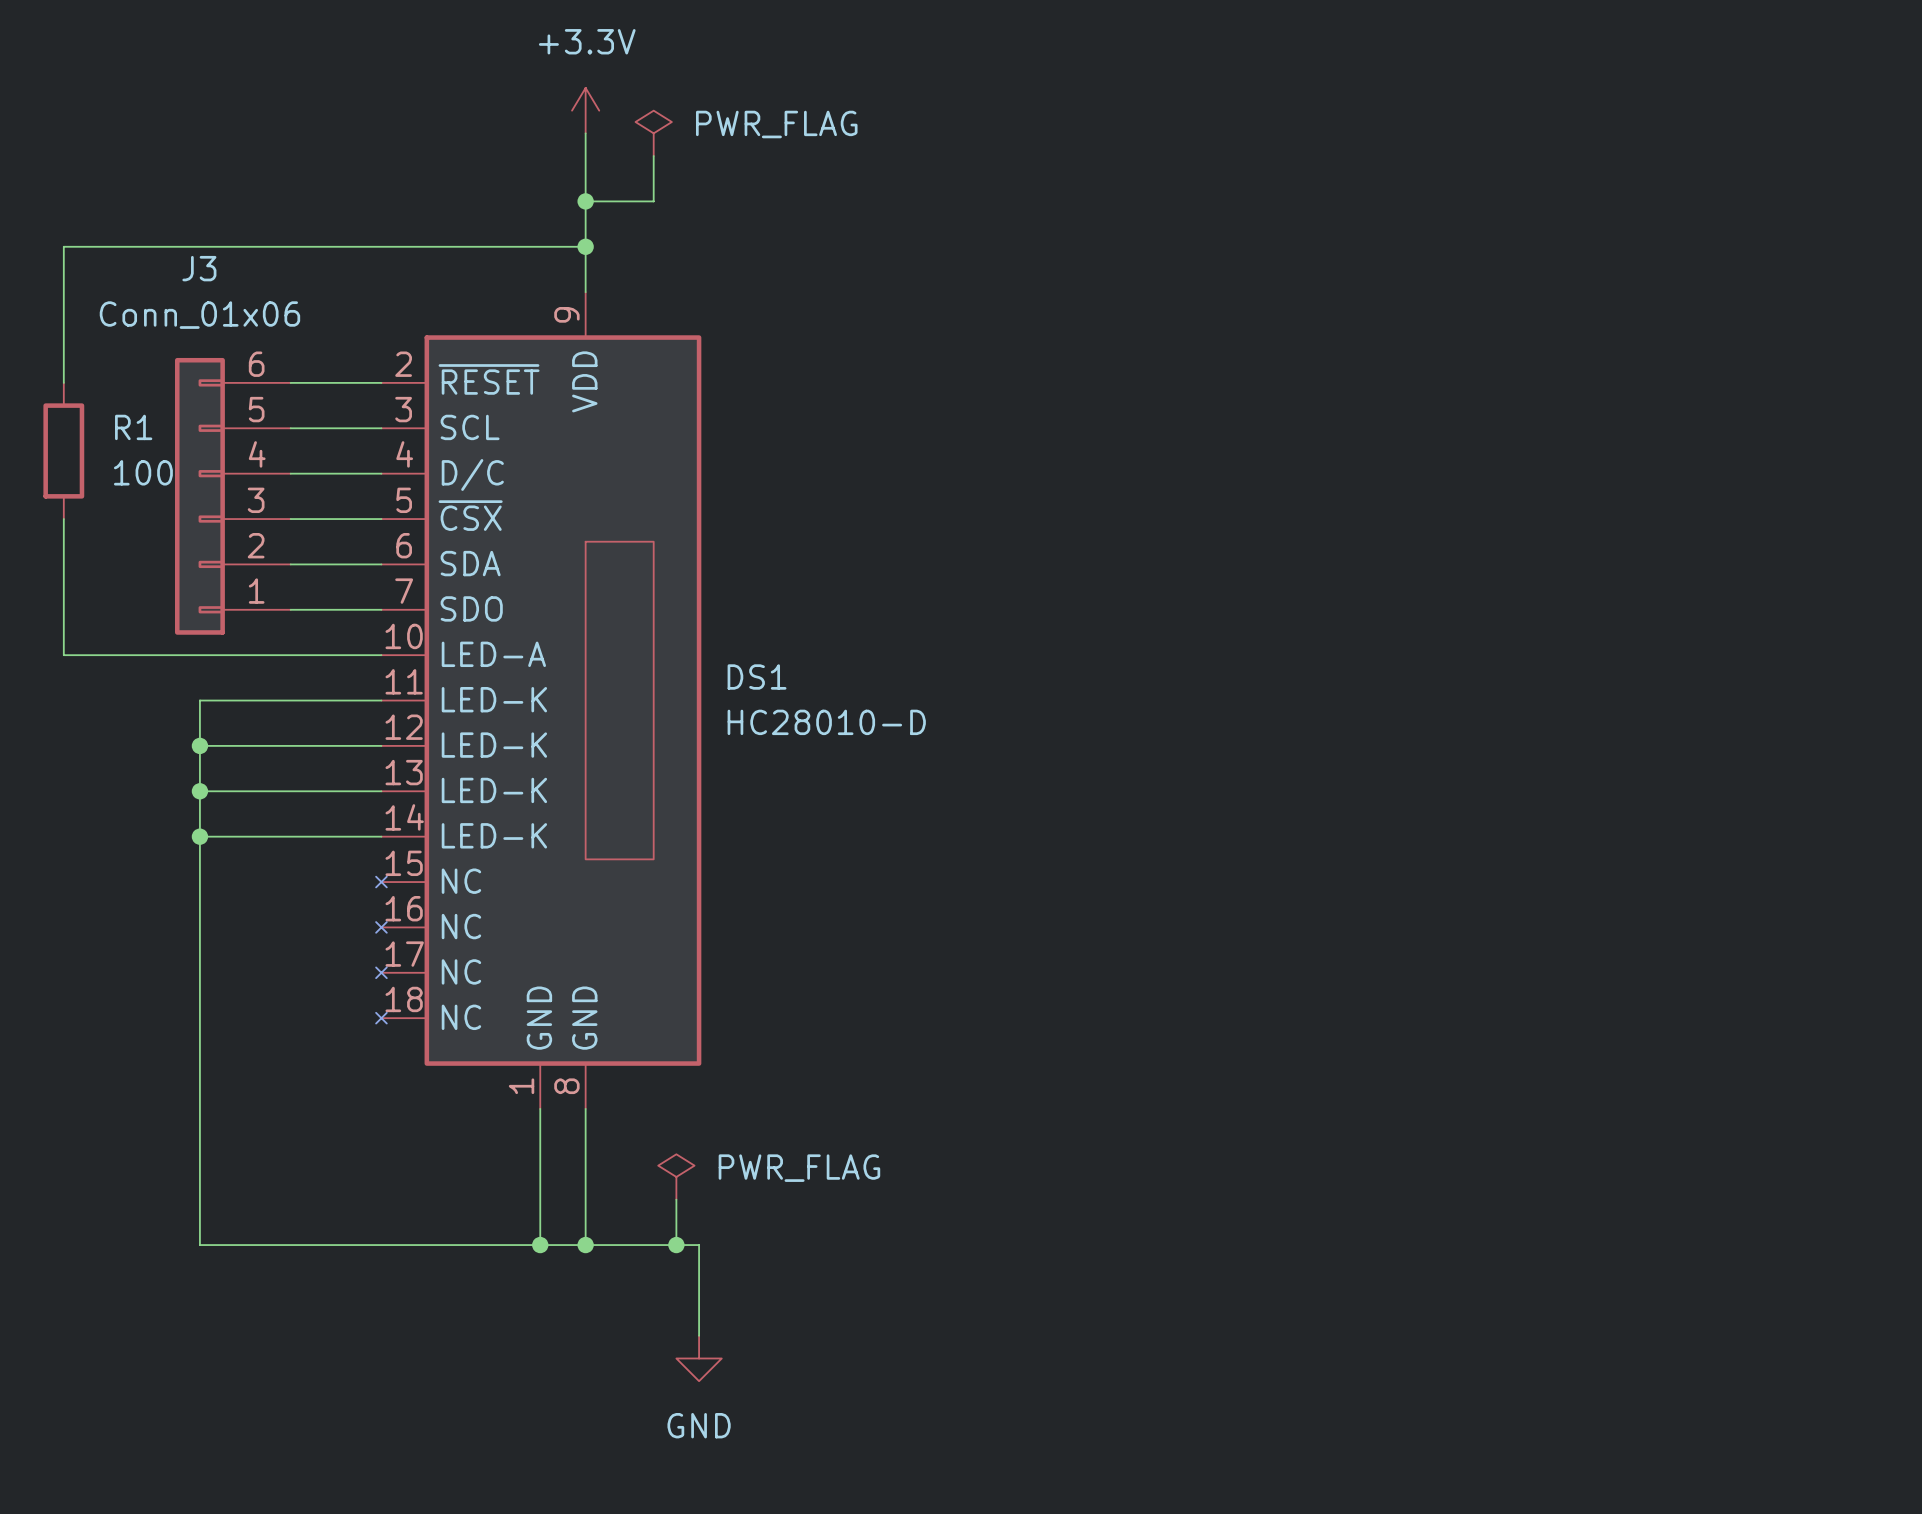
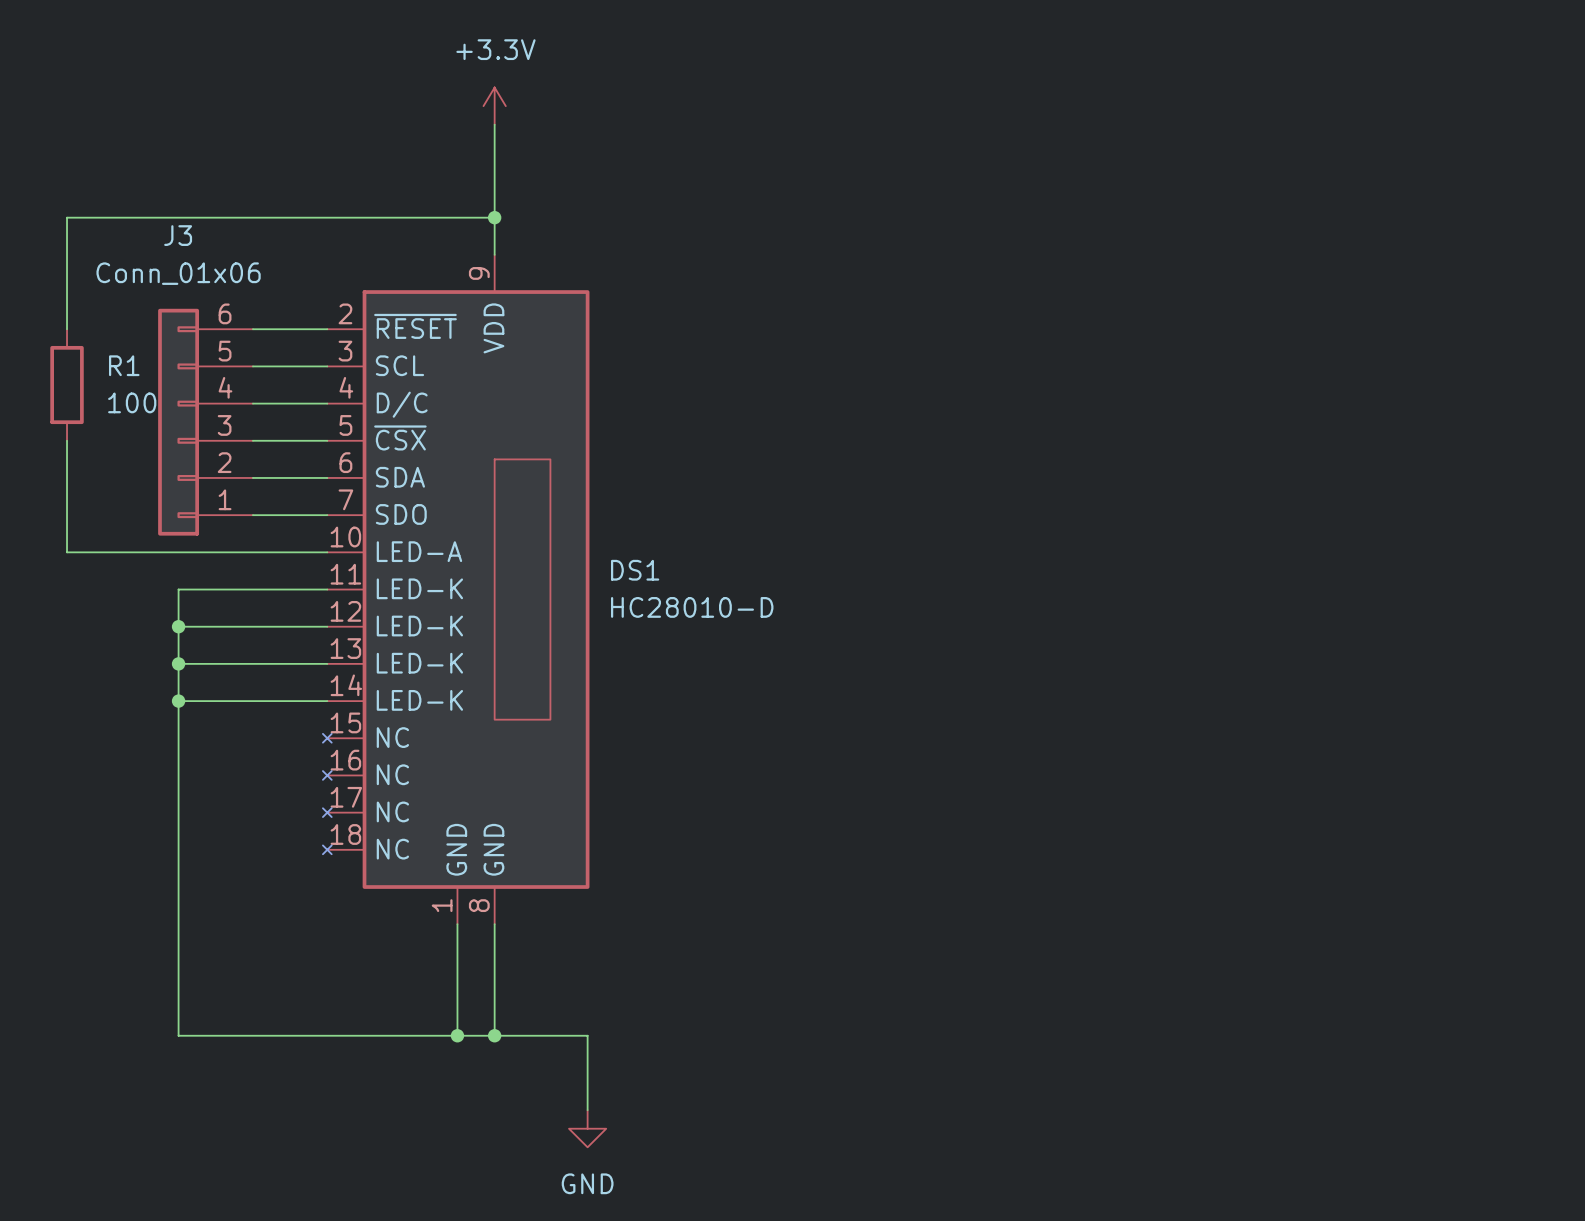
power symbol: PWR_FLAG (653, 133) -> none
wire: (653, 156) (653, 201) (585, 201) -> none
junction: (585, 201) -> none
power symbol: PWR_FLAG (676, 1176) -> none
wire: (676, 1199) (676, 1245) -> none
junction: (676, 1245) -> none

